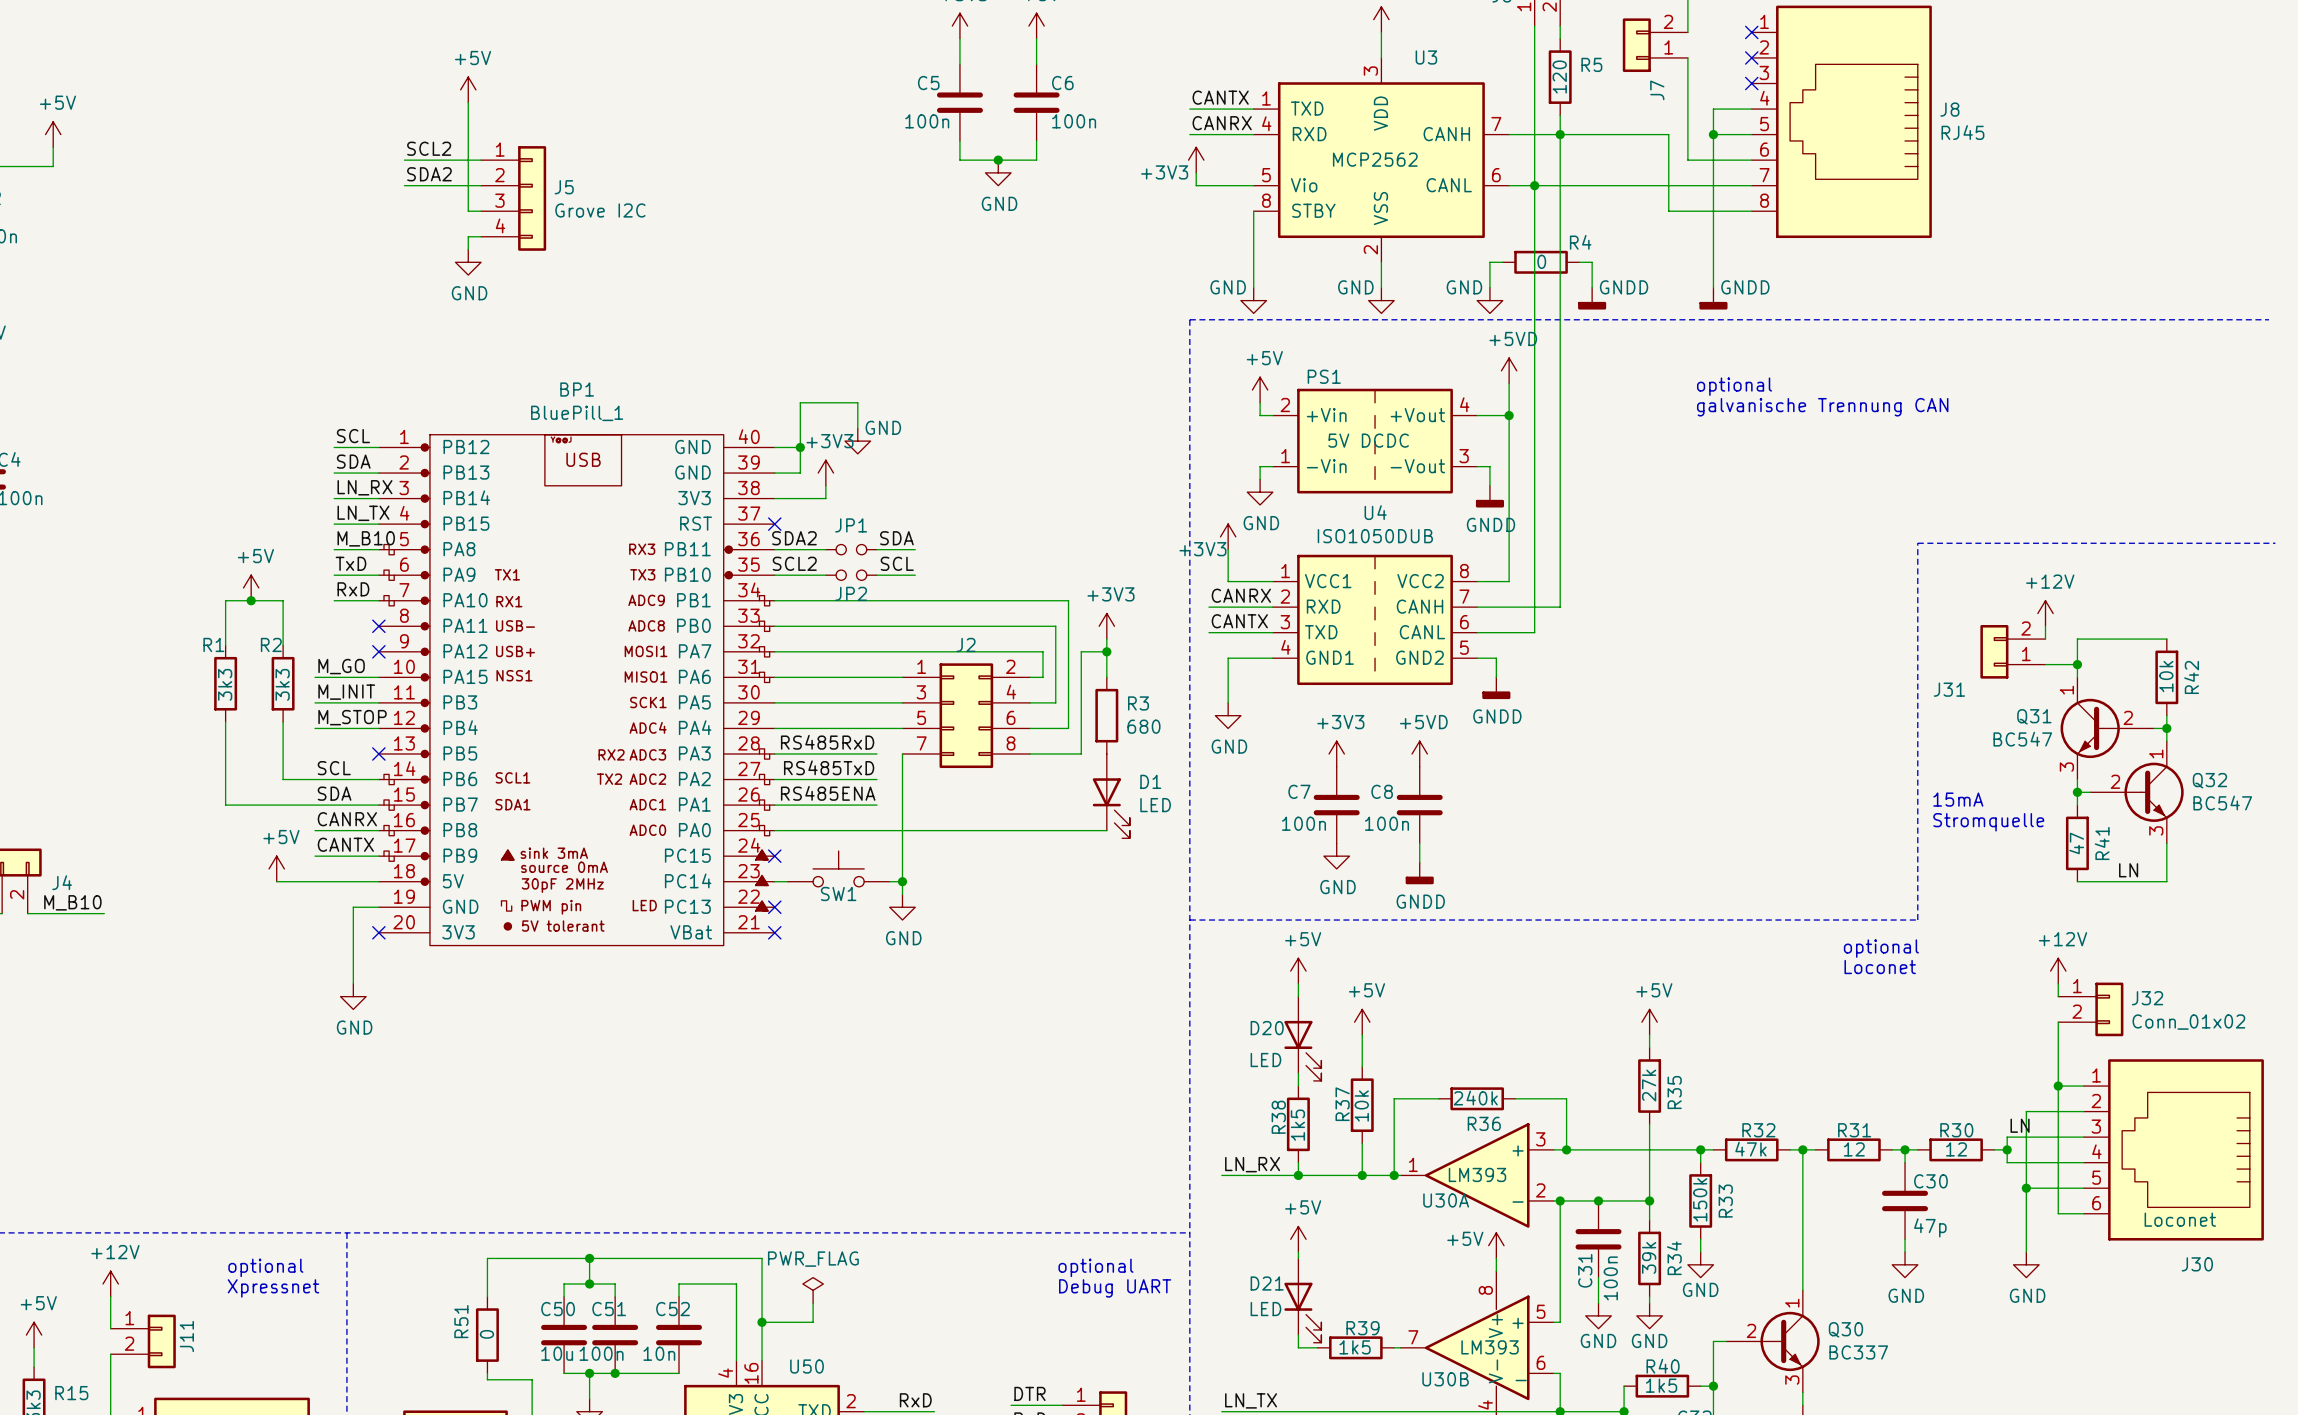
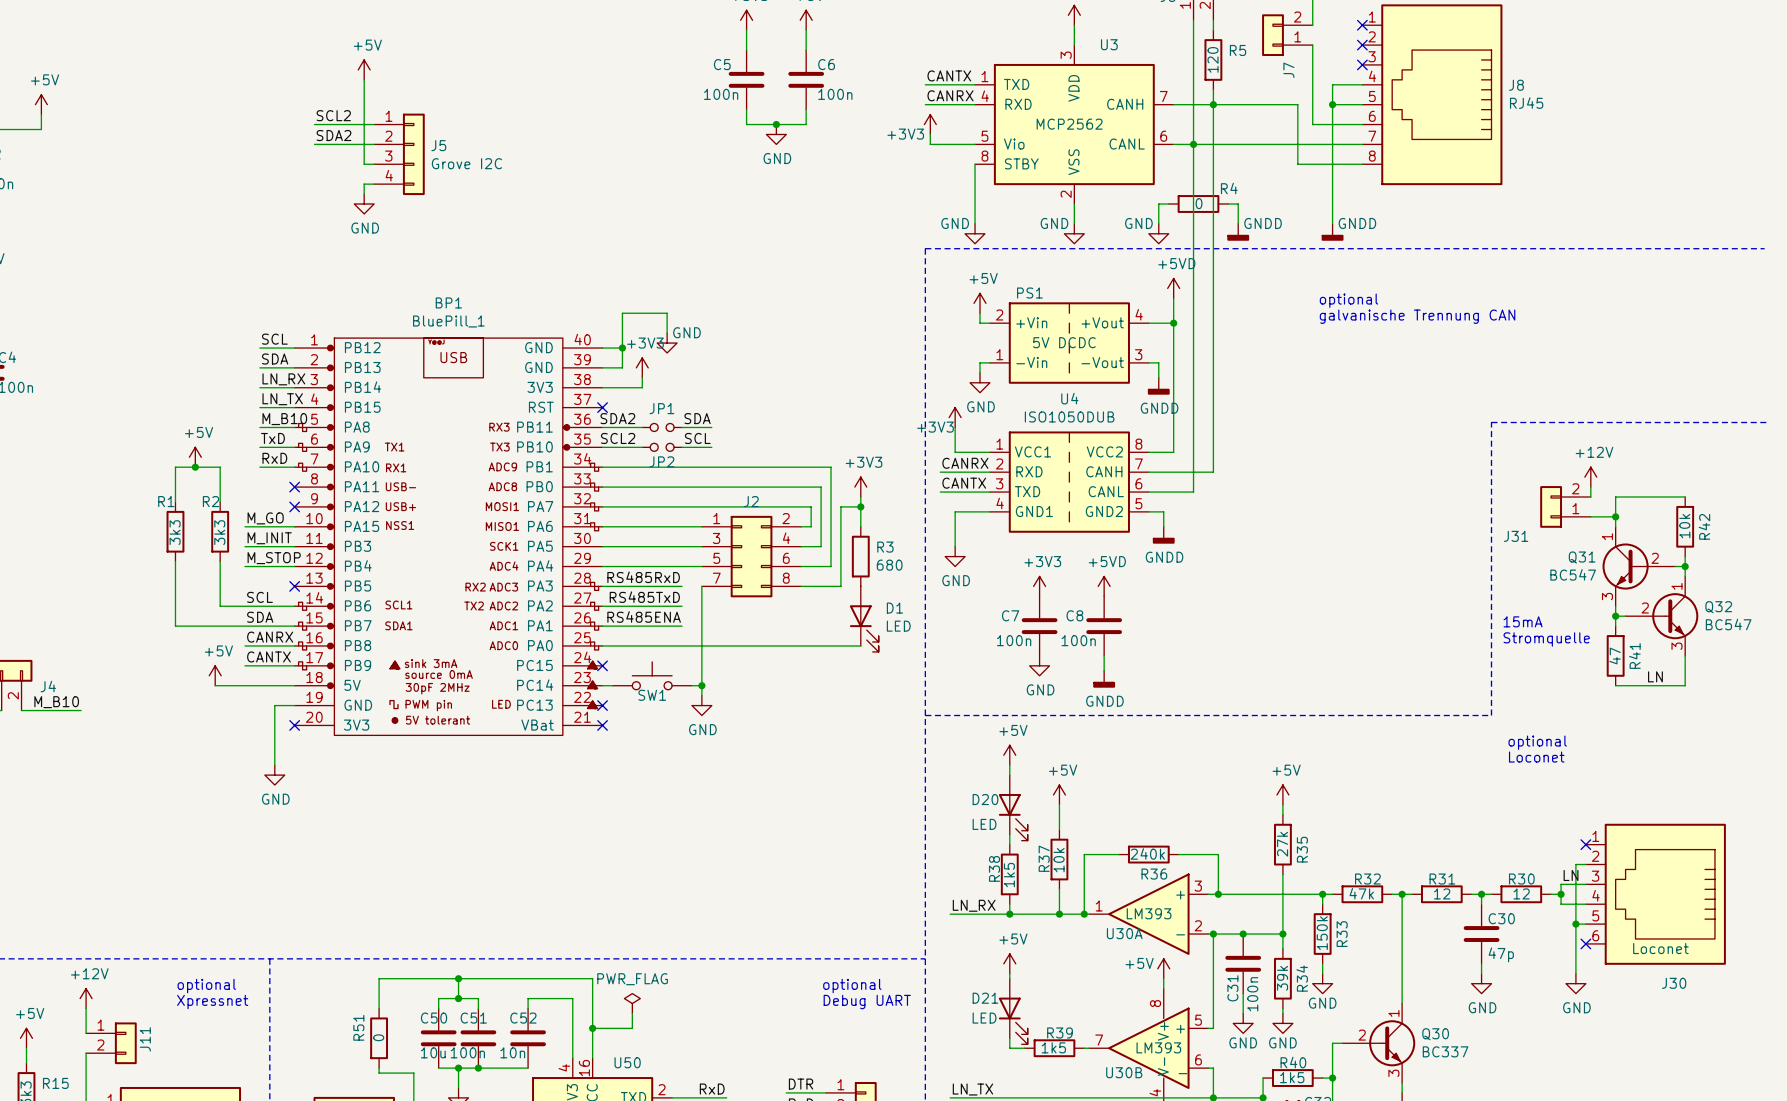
text position: optional (1881, 948) -> optional (1537, 742)
text position: Loconet (1880, 967) -> Loconet (1536, 757)
power symbol: +12V (2058, 971) -> none
wire: (2058, 983) (2058, 996) -> none
J32: Conn_01x02 (2090, 1009) -> none
wire: (2058, 1022) (2058, 1213) (2083, 1213) -> none
no-connect mark: none -> (1585, 844)
junction: (2058, 1086) -> none
J30 position: (2173, 1149) -> (1655, 894)
no-connect mark: none -> (1585, 943)

